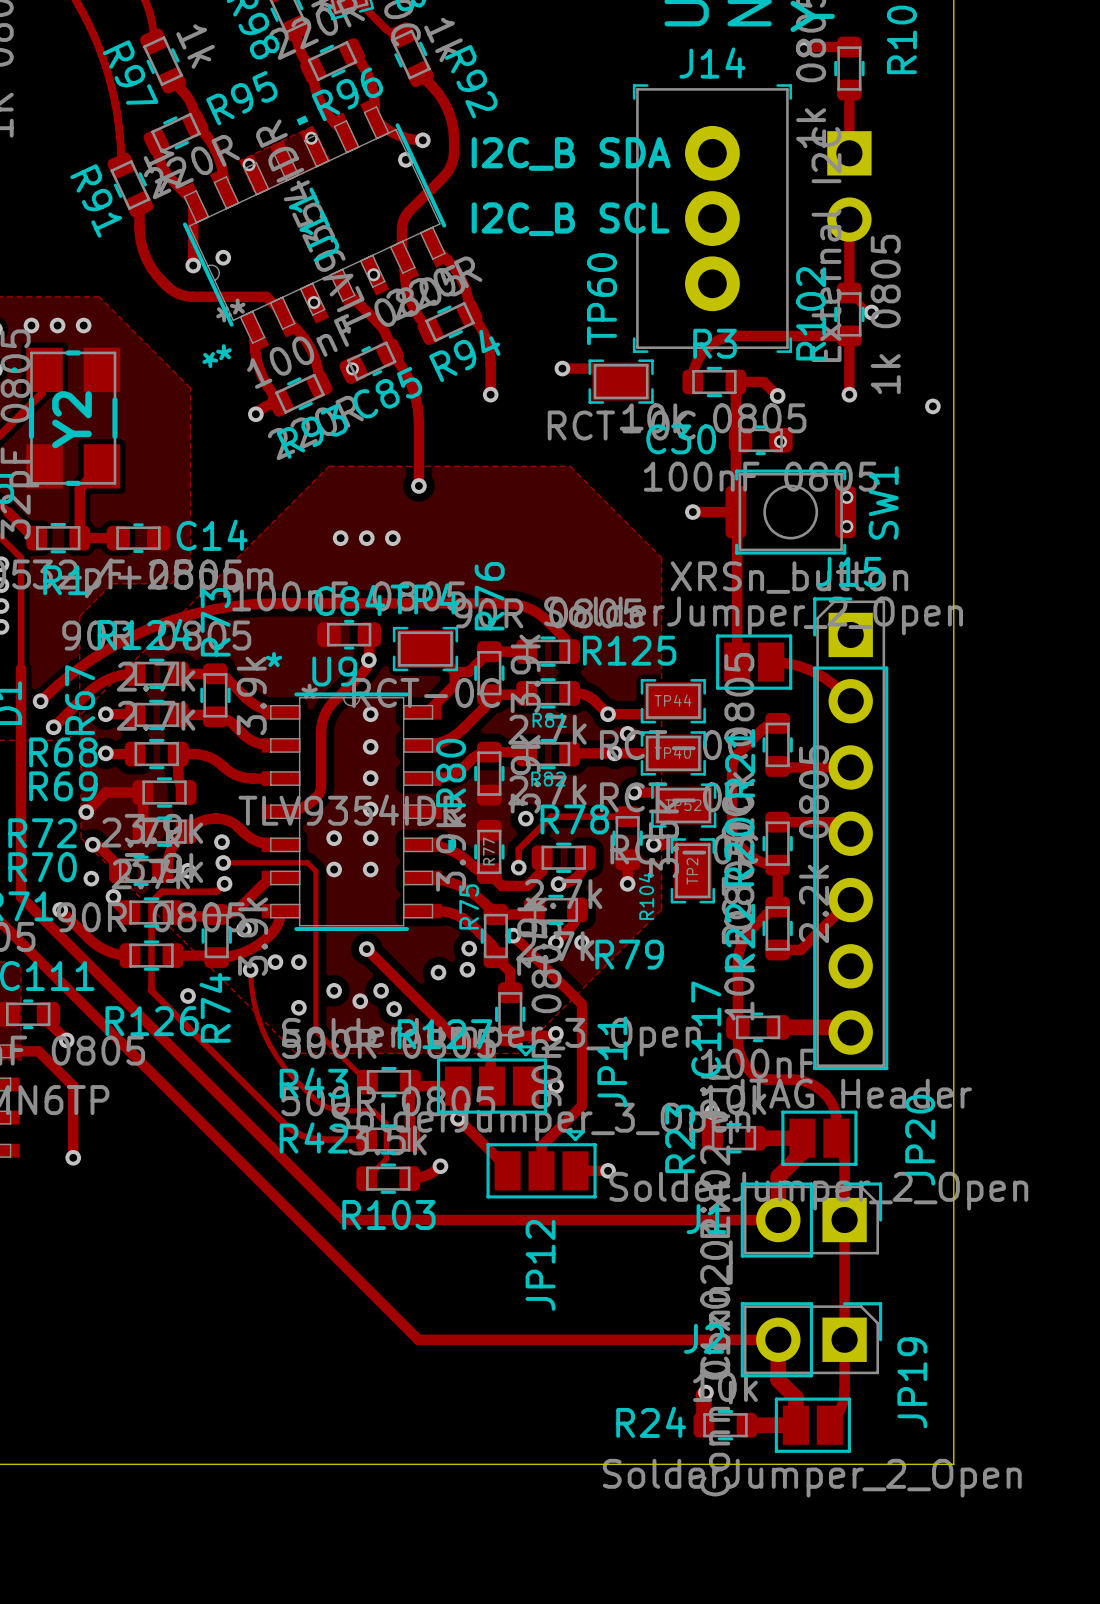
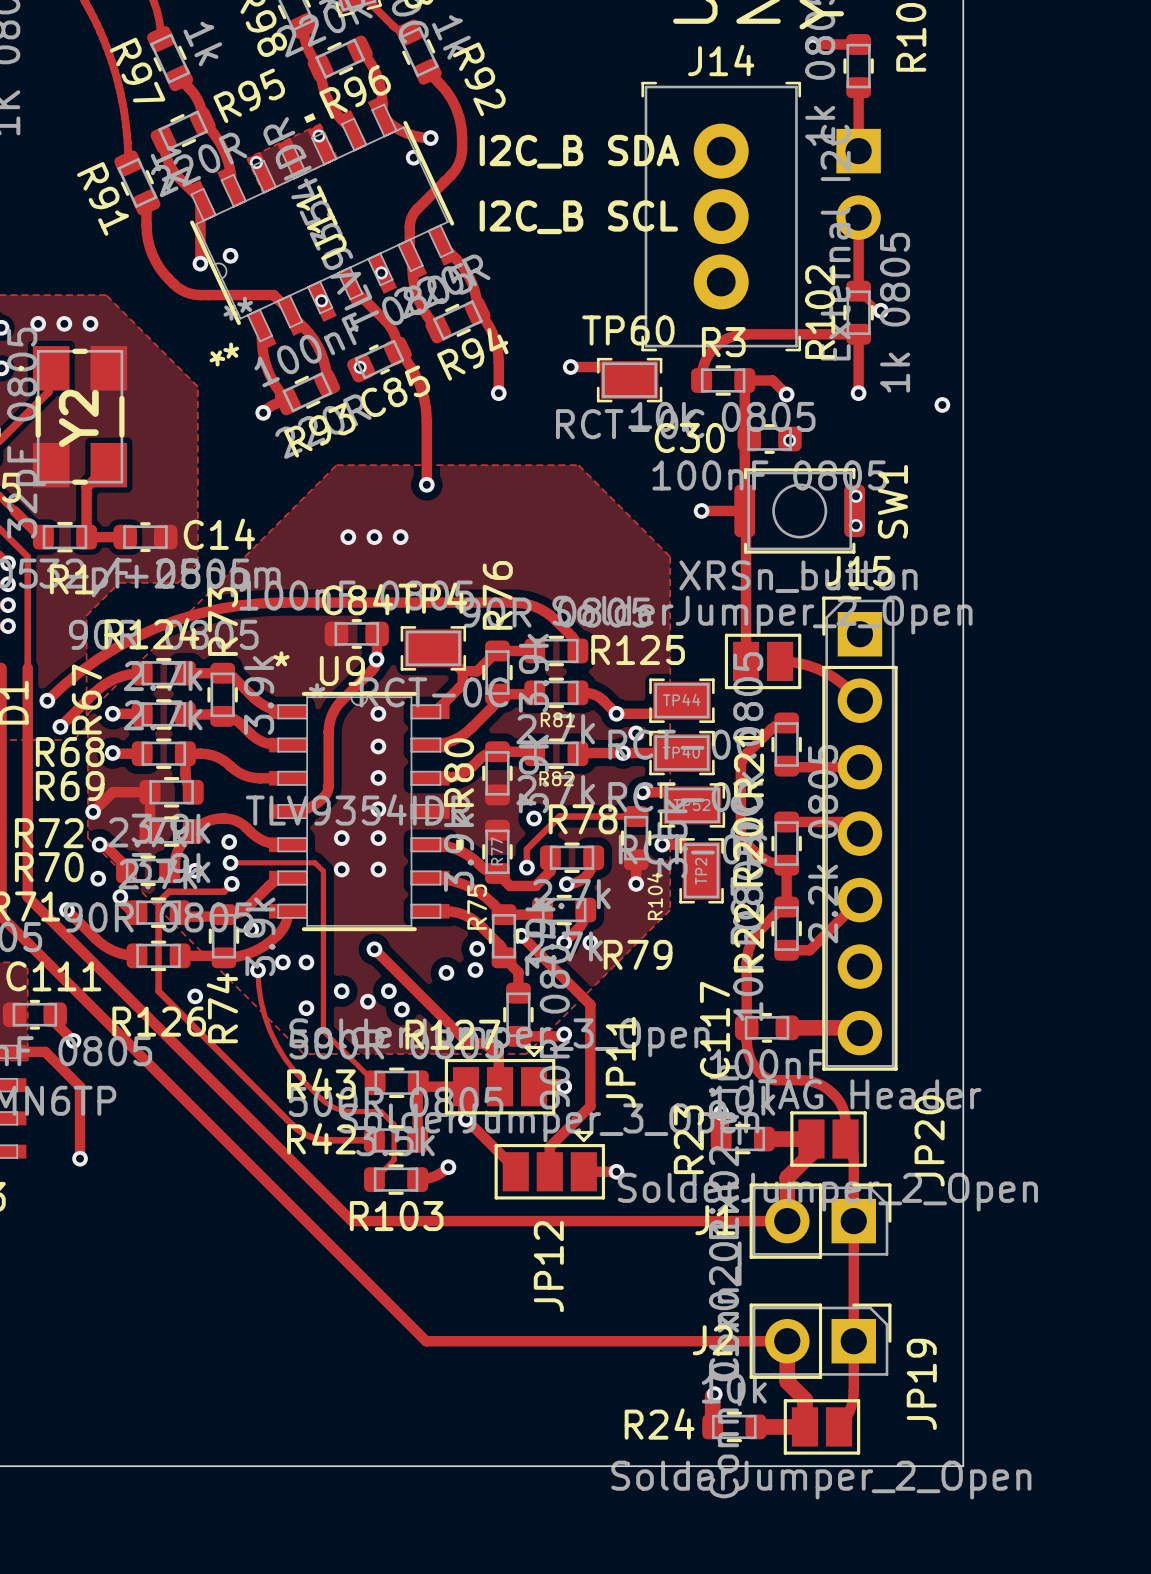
TP60 name rotation: 0° (601, 299) -> 90° clockwise (628, 330)

